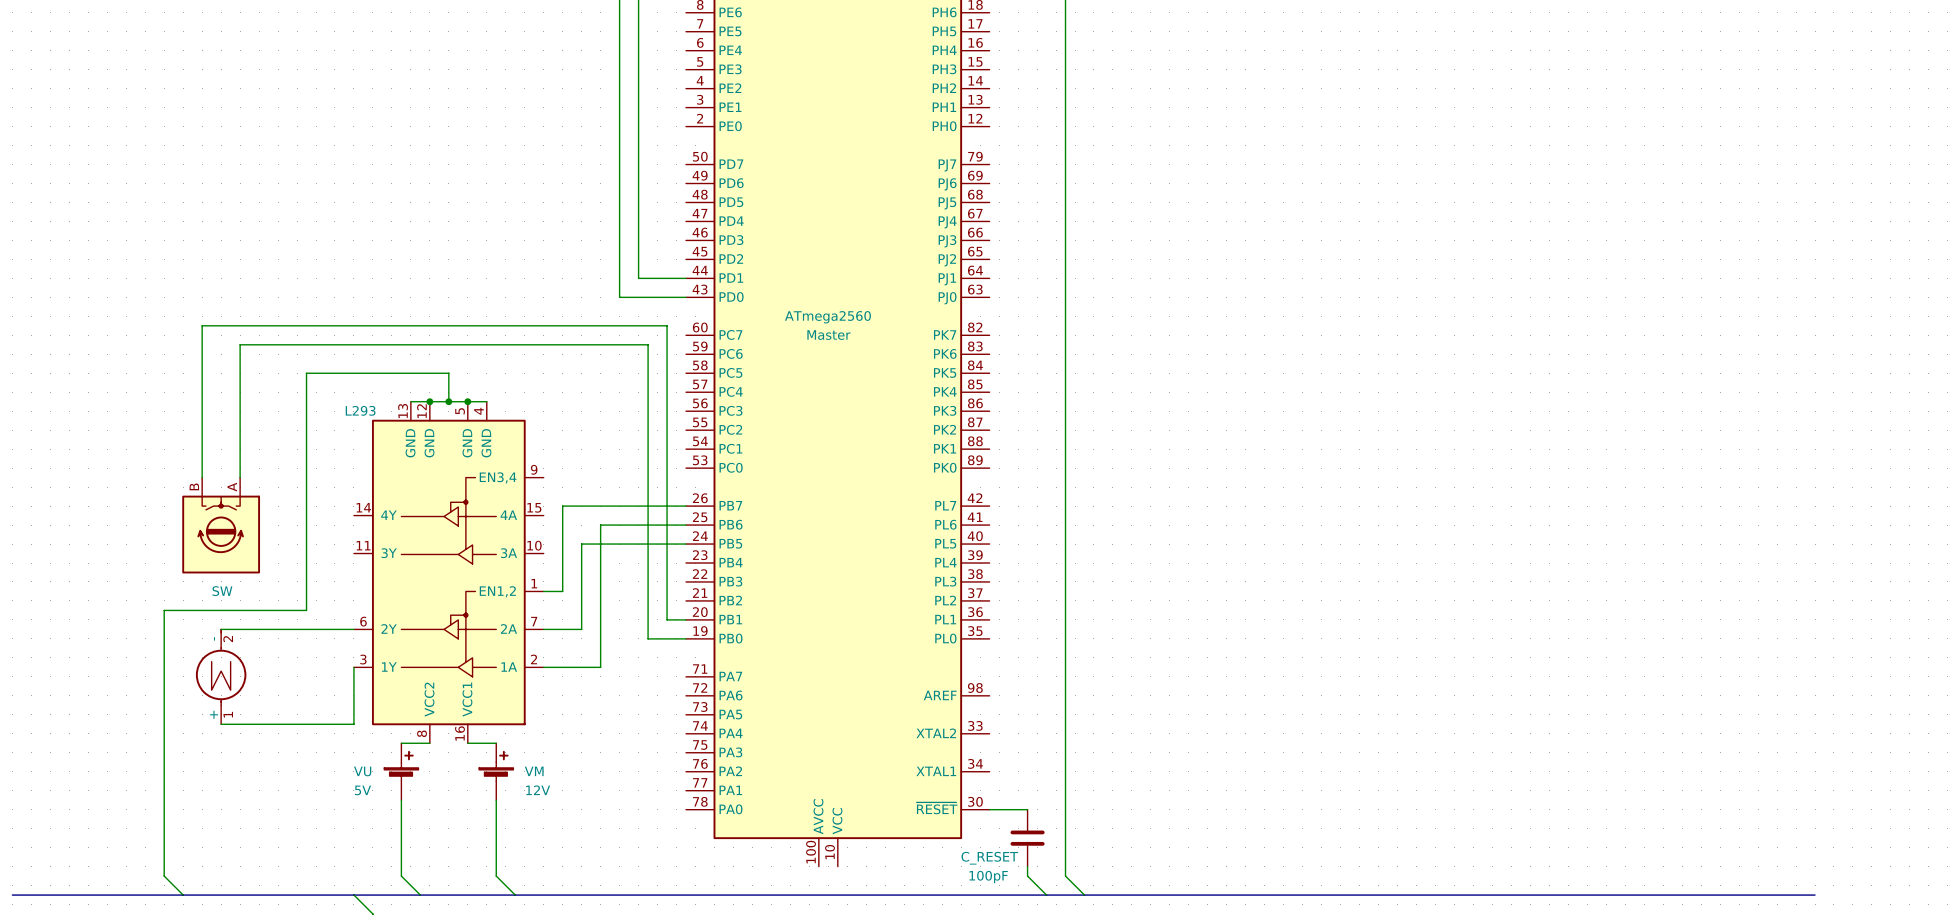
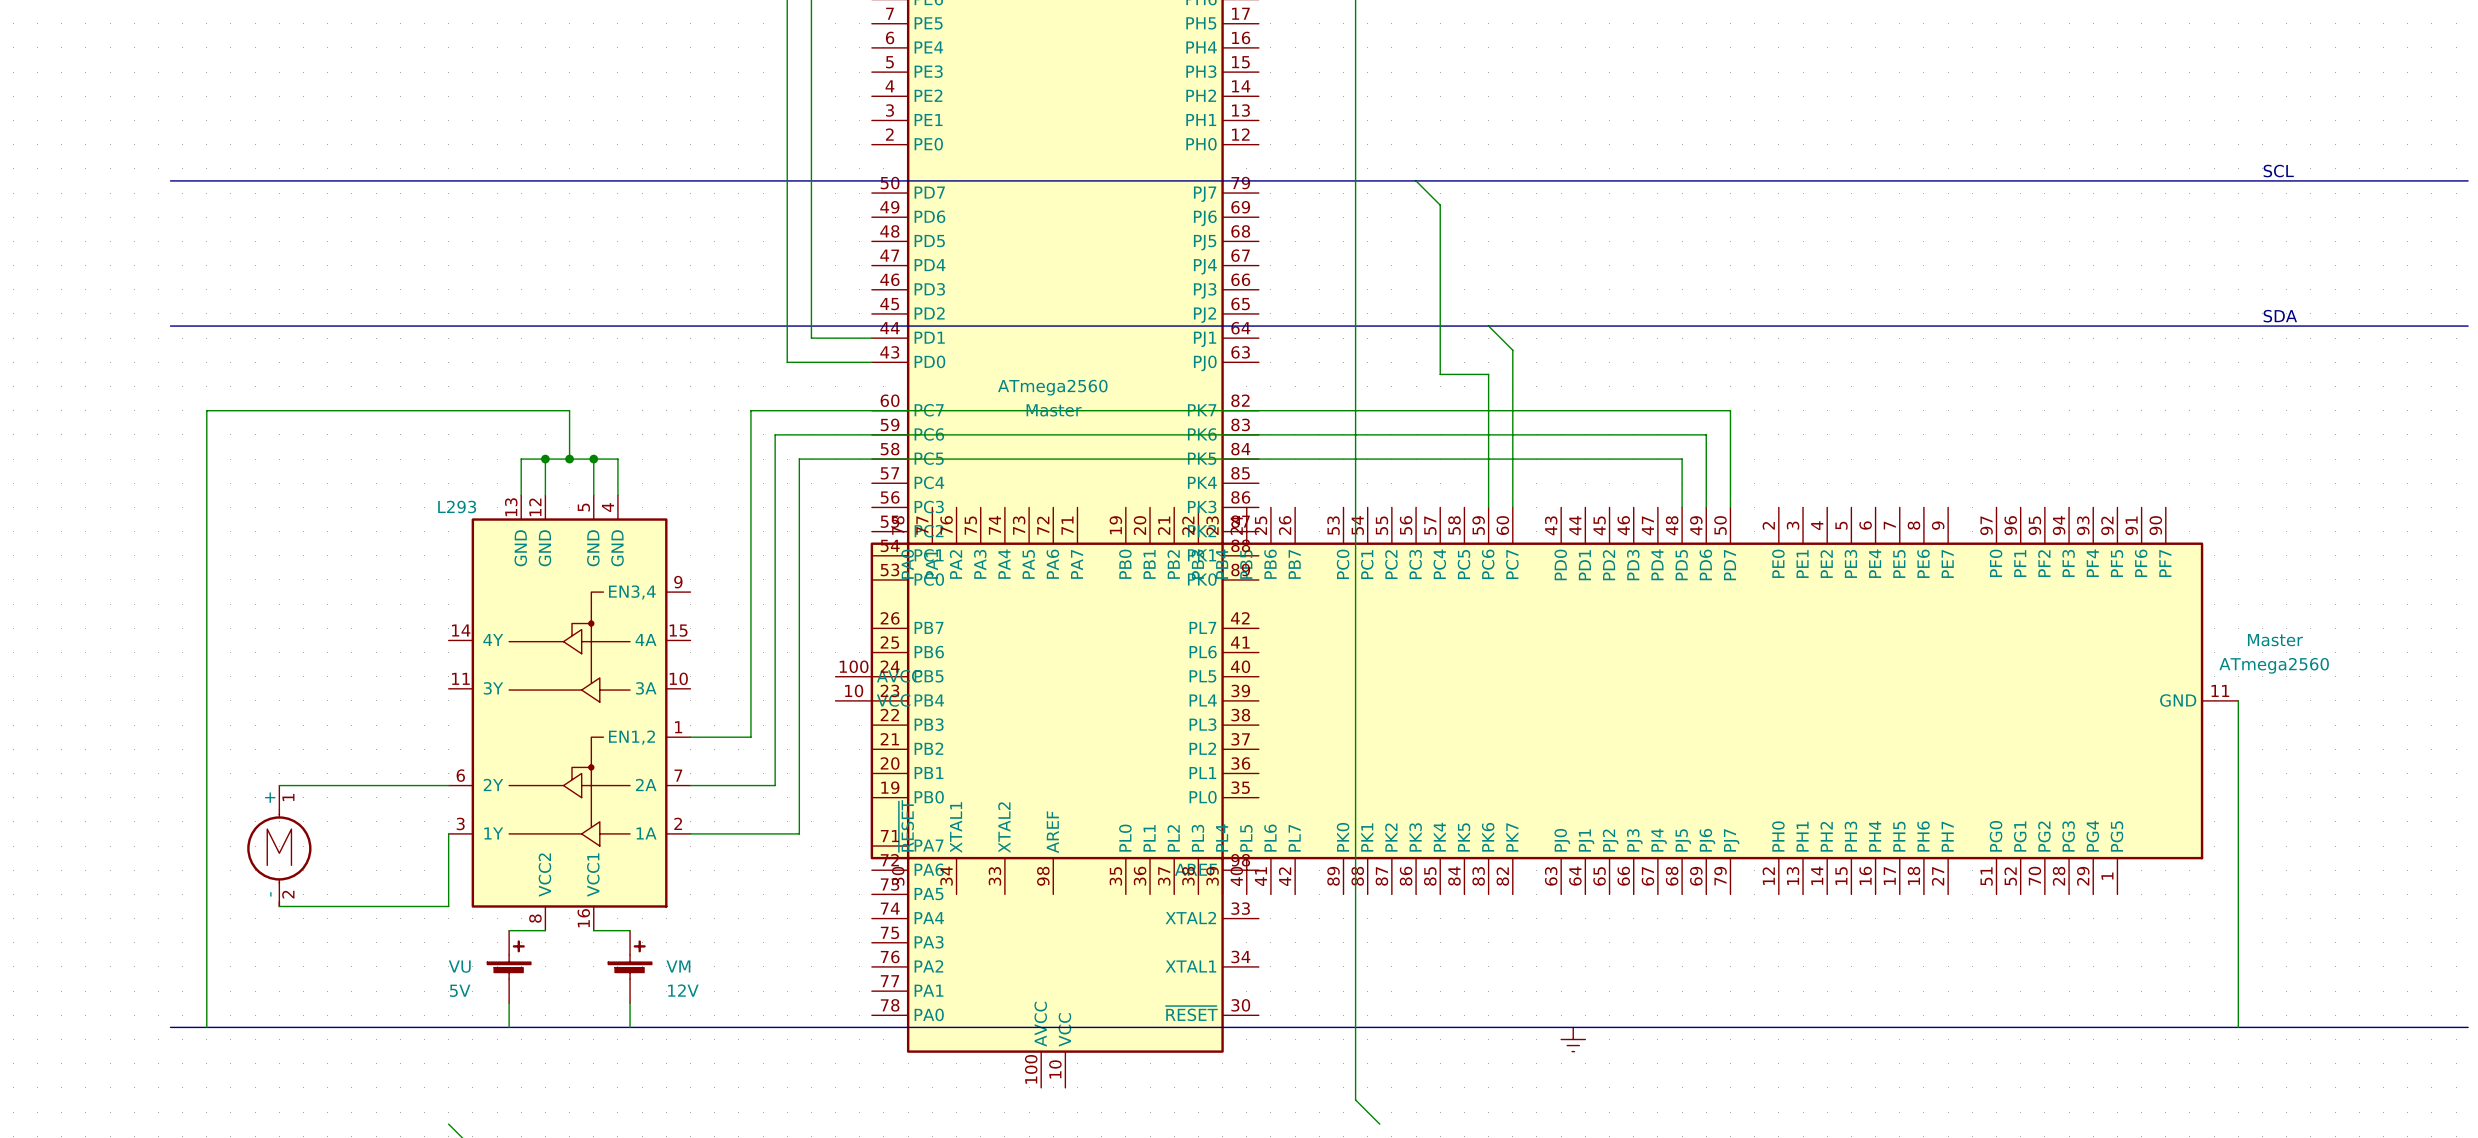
text: none -> SCL (2278, 171)
bus: none -> (170, 180) (2468, 180)
wire: none -> (1416, 180) (1440, 205) (1440, 374) (1488, 374) (1488, 507)
text: none -> SDA (2280, 316)
bus: none -> (170, 326) (2468, 326)
wire: none -> (1488, 326) (1512, 350) (1512, 507)
wire: (410, 373) (306, 373) (306, 610) (164, 610) -> (617, 495) (617, 459) (569, 459) (569, 410) (206, 410) (206, 761)
wire: none -> (545, 459) (545, 495)
junction: none -> (545, 459)
wire: (448, 373) (448, 401) -> (593, 459) (593, 495)
junction: none -> (569, 459)
junction: none -> (593, 459)
wire: (410, 401) (486, 401) -> (521, 495) (521, 459)
junction: (429, 401) -> none
junction: (448, 401) -> none
junction: (467, 401) -> none
wire: (202, 477) (202, 325) (667, 325) (667, 619) (686, 619) -> none
wire: (240, 477) (240, 344) (648, 344) (648, 638) (686, 638) -> none
wire: (686, 506) (562, 506) (562, 591) -> (1730, 507) (1730, 410) (750, 410) (750, 737) (714, 737)
SW: (221, 525) -> none
wire: (686, 525) (600, 525) (600, 667) -> (1682, 507) (1682, 459) (799, 459) (799, 833) (763, 833)
wire: (686, 544) (581, 544) (581, 629) -> (1706, 507) (1706, 434) (775, 434) (775, 785) (738, 785)
Master: none -> ATmega2560 (1536, 700)
wire: none -> (2238, 700) (2238, 1027)
part rotation: 0° (221, 667) -> 180° (279, 858)
wire: (989, 809) (1027, 809) -> none
wire: (164, 819) (164, 876) (183, 895) -> none
wire: (401, 819) (401, 876) (420, 895) -> none
wire: (496, 819) (496, 876) (515, 895) -> none
power symbol: none -> (1573, 1039)
C_RESET: 100pF (1027, 838) -> none
wire: (1027, 866) (1027, 876) (1046, 895) -> none
bus: (12, 895) (1815, 895) -> (170, 1027) (2468, 1027)

